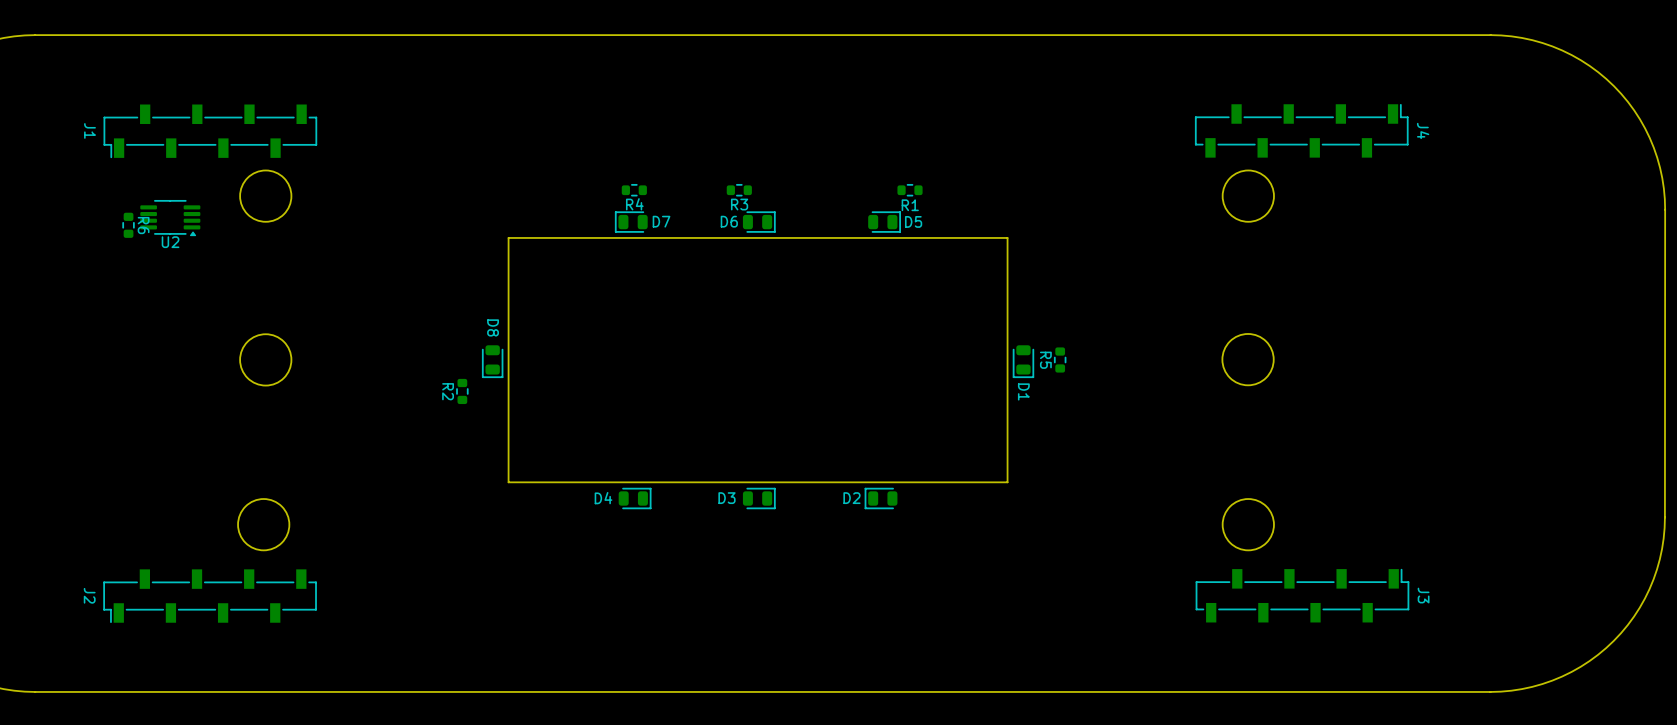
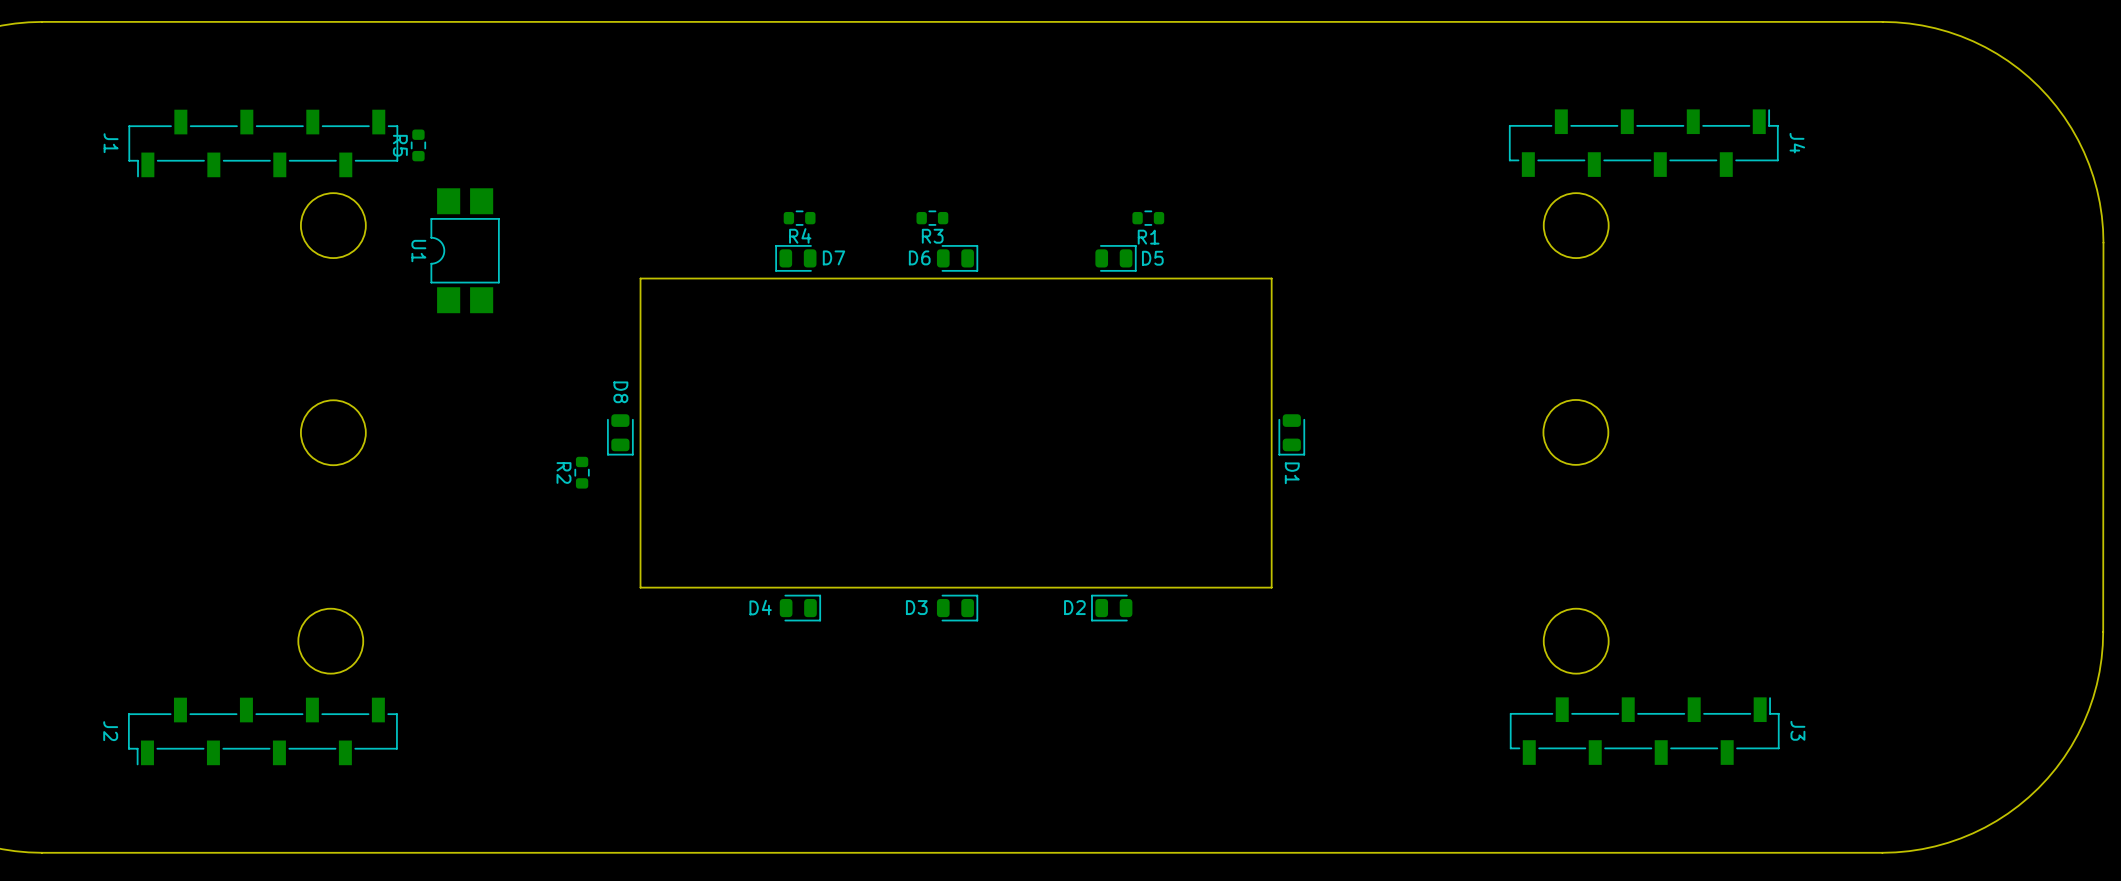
U1: none -> (465, 250)
U2: (170, 218) -> none
R6: (128, 225) -> none
R5 position: (1060, 360) -> (418, 145)

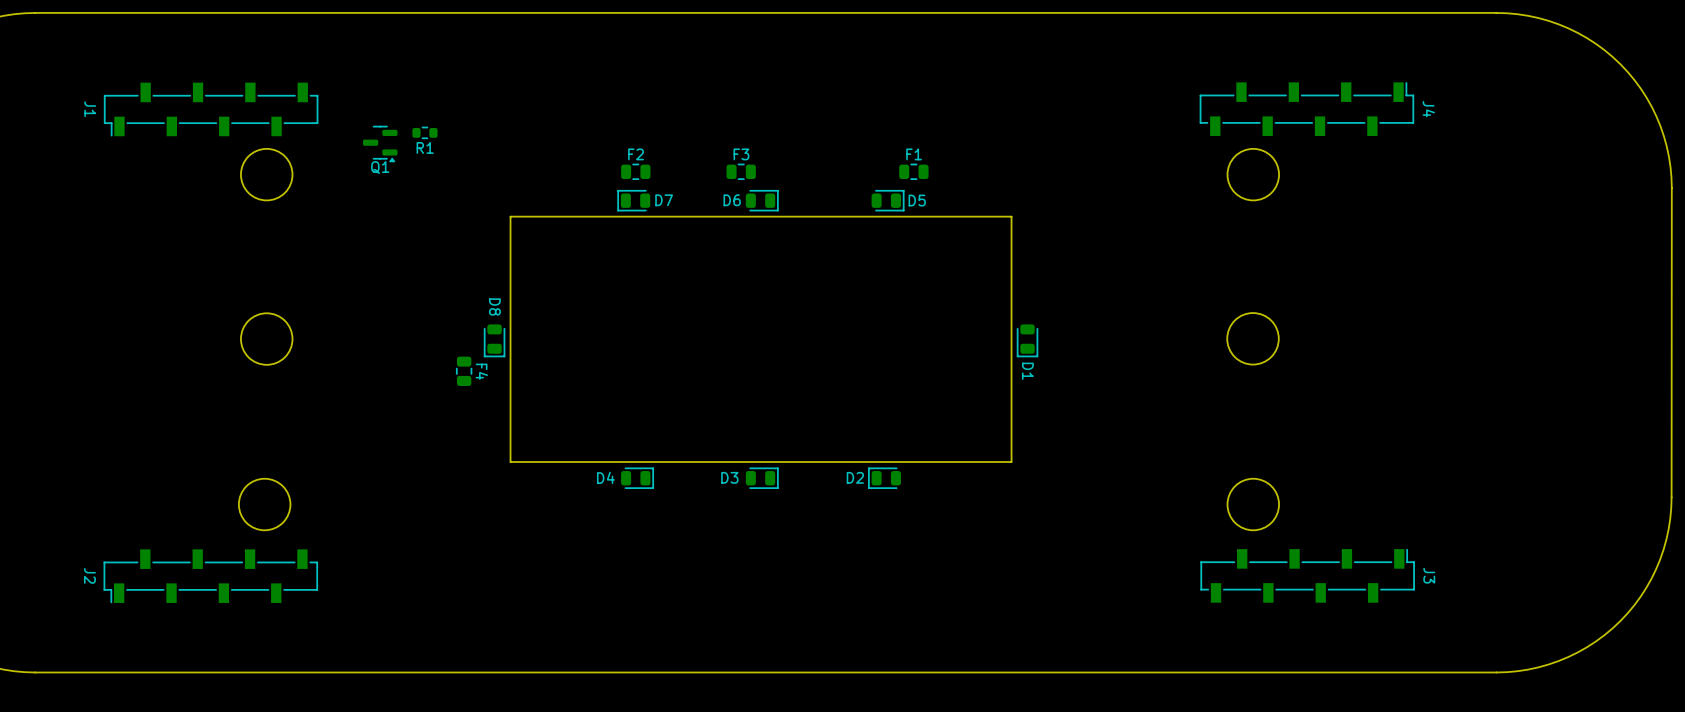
R5: (418, 145) -> none
Q1: none -> (380, 144)
R4: (799, 218) -> none
R3: (932, 218) -> none
R1 position: (1148, 218) -> (424, 132)
F2: none -> (635, 171)
F3: none -> (741, 171)
F1: none -> (913, 171)
U1: (465, 250) -> none
R2: (582, 472) -> none
F4: none -> (464, 371)

